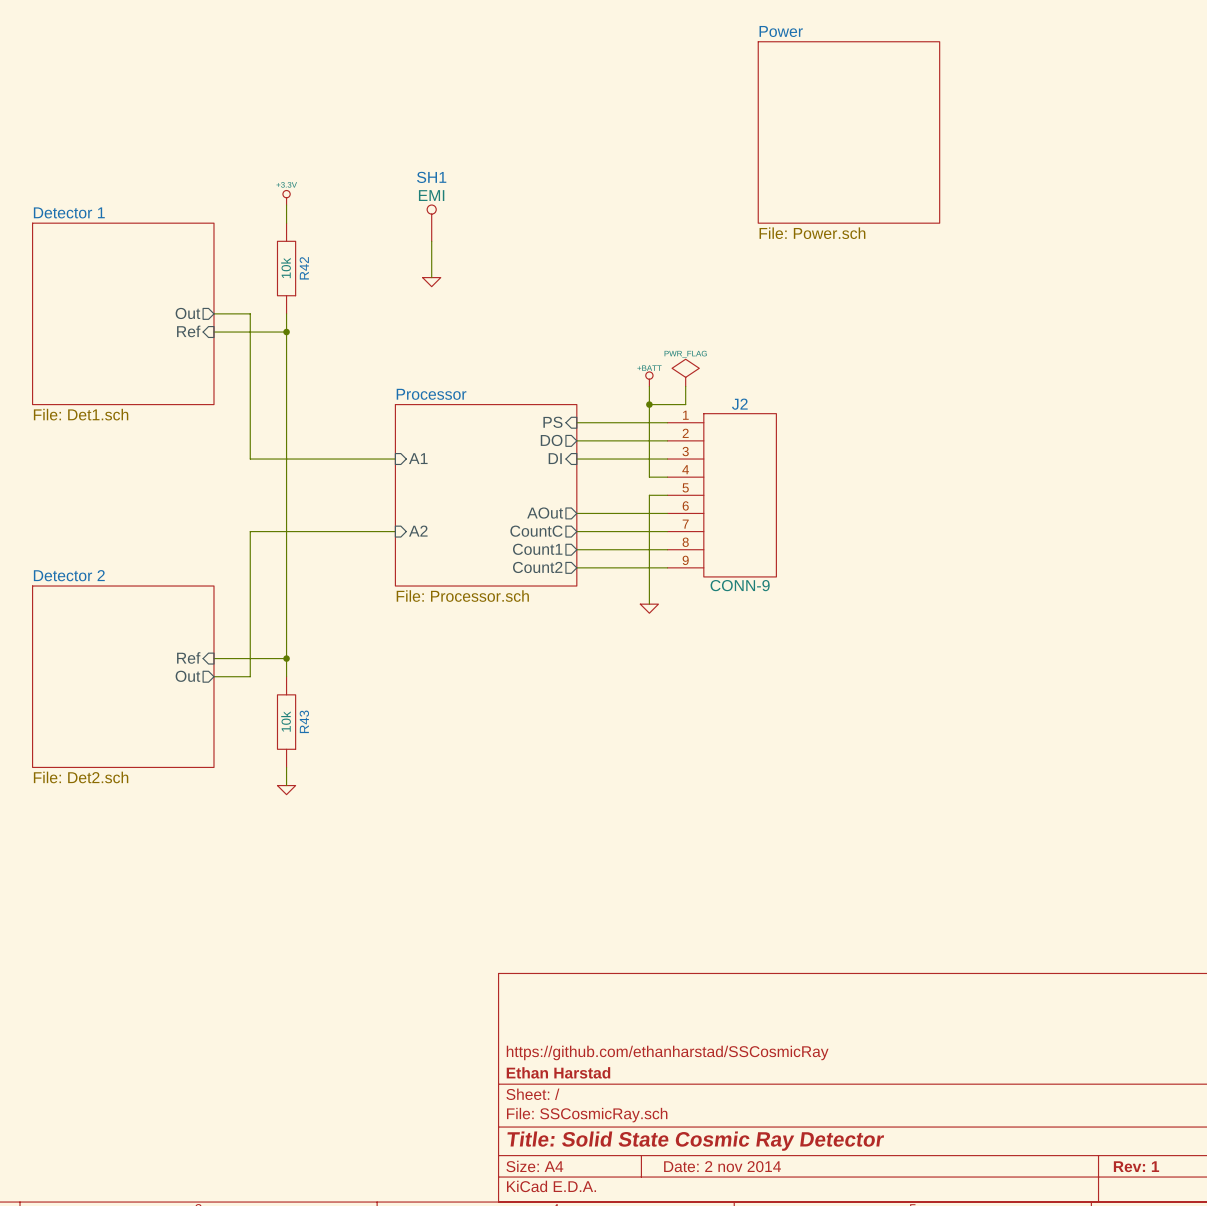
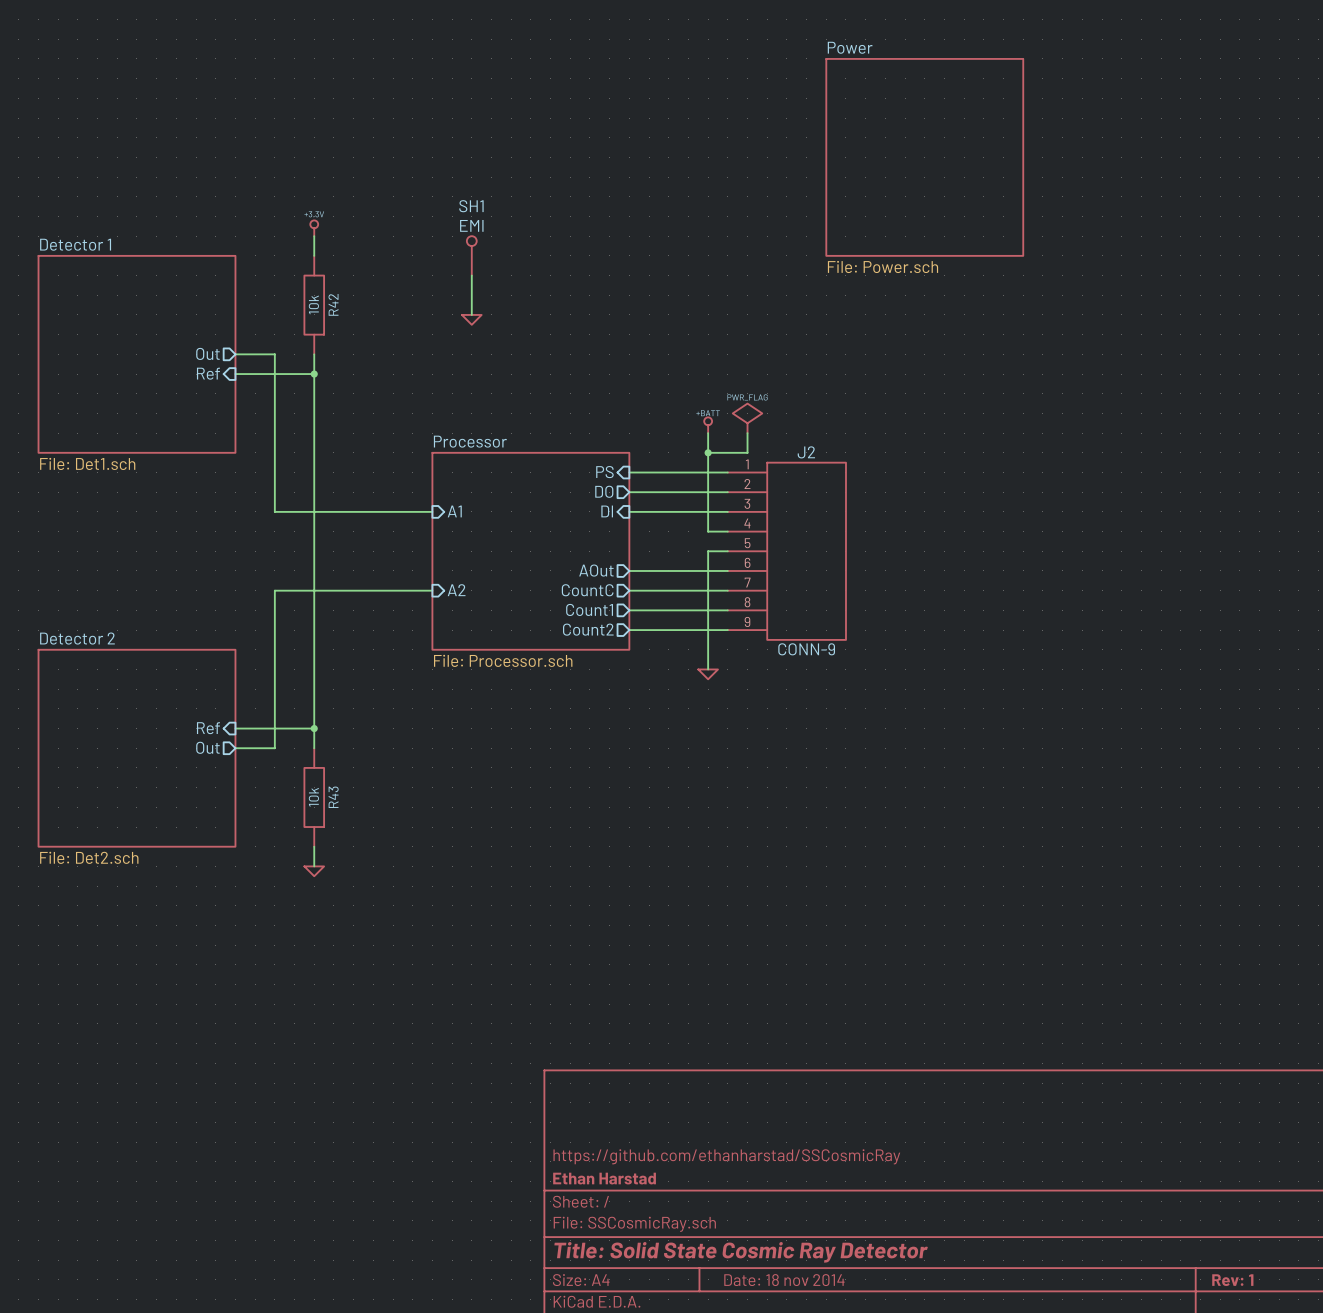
title block: Date: 2 nov 2014 (722, 1166) -> Date: 18 nov 2014 (784, 1280)

